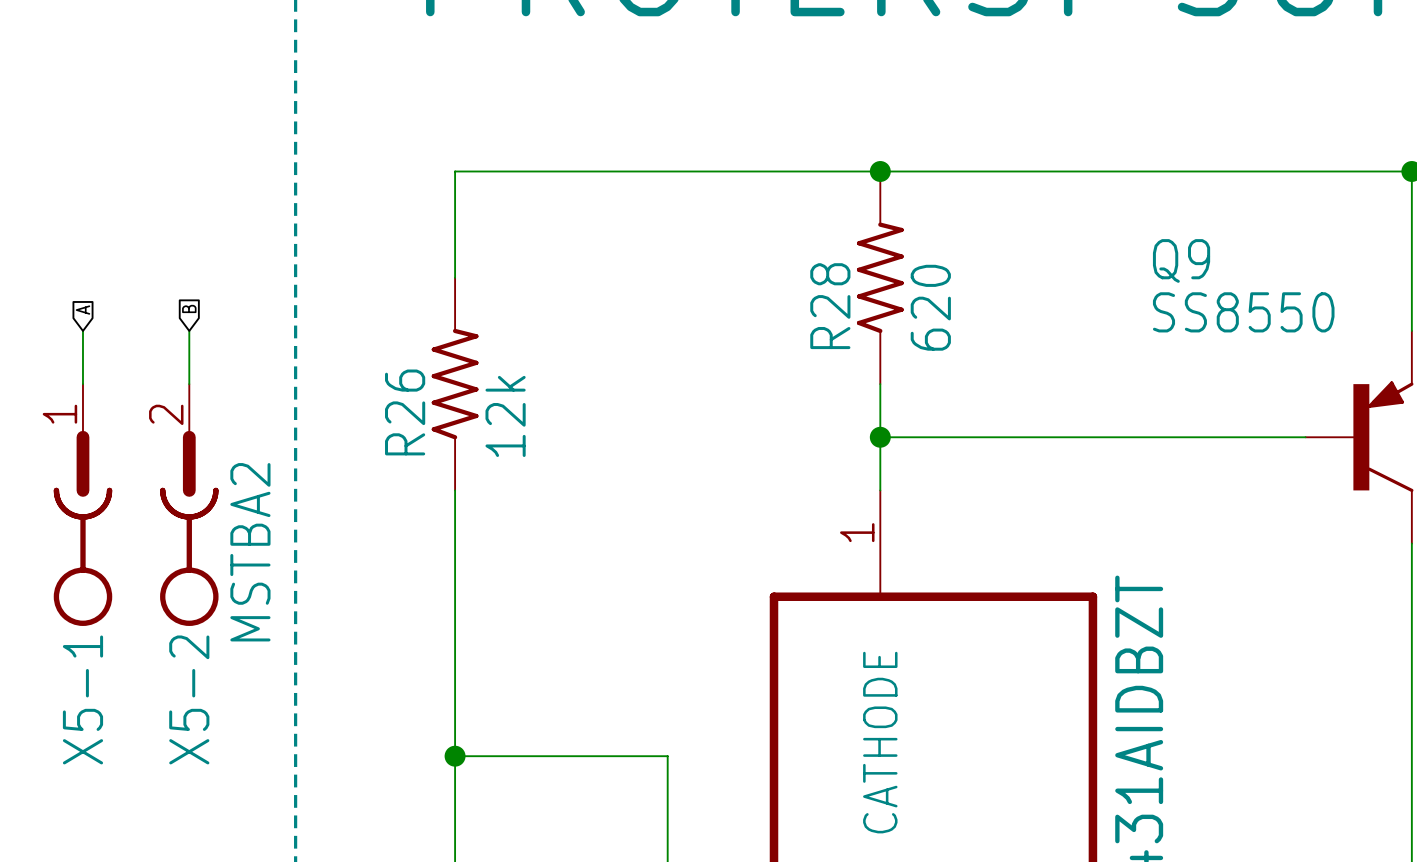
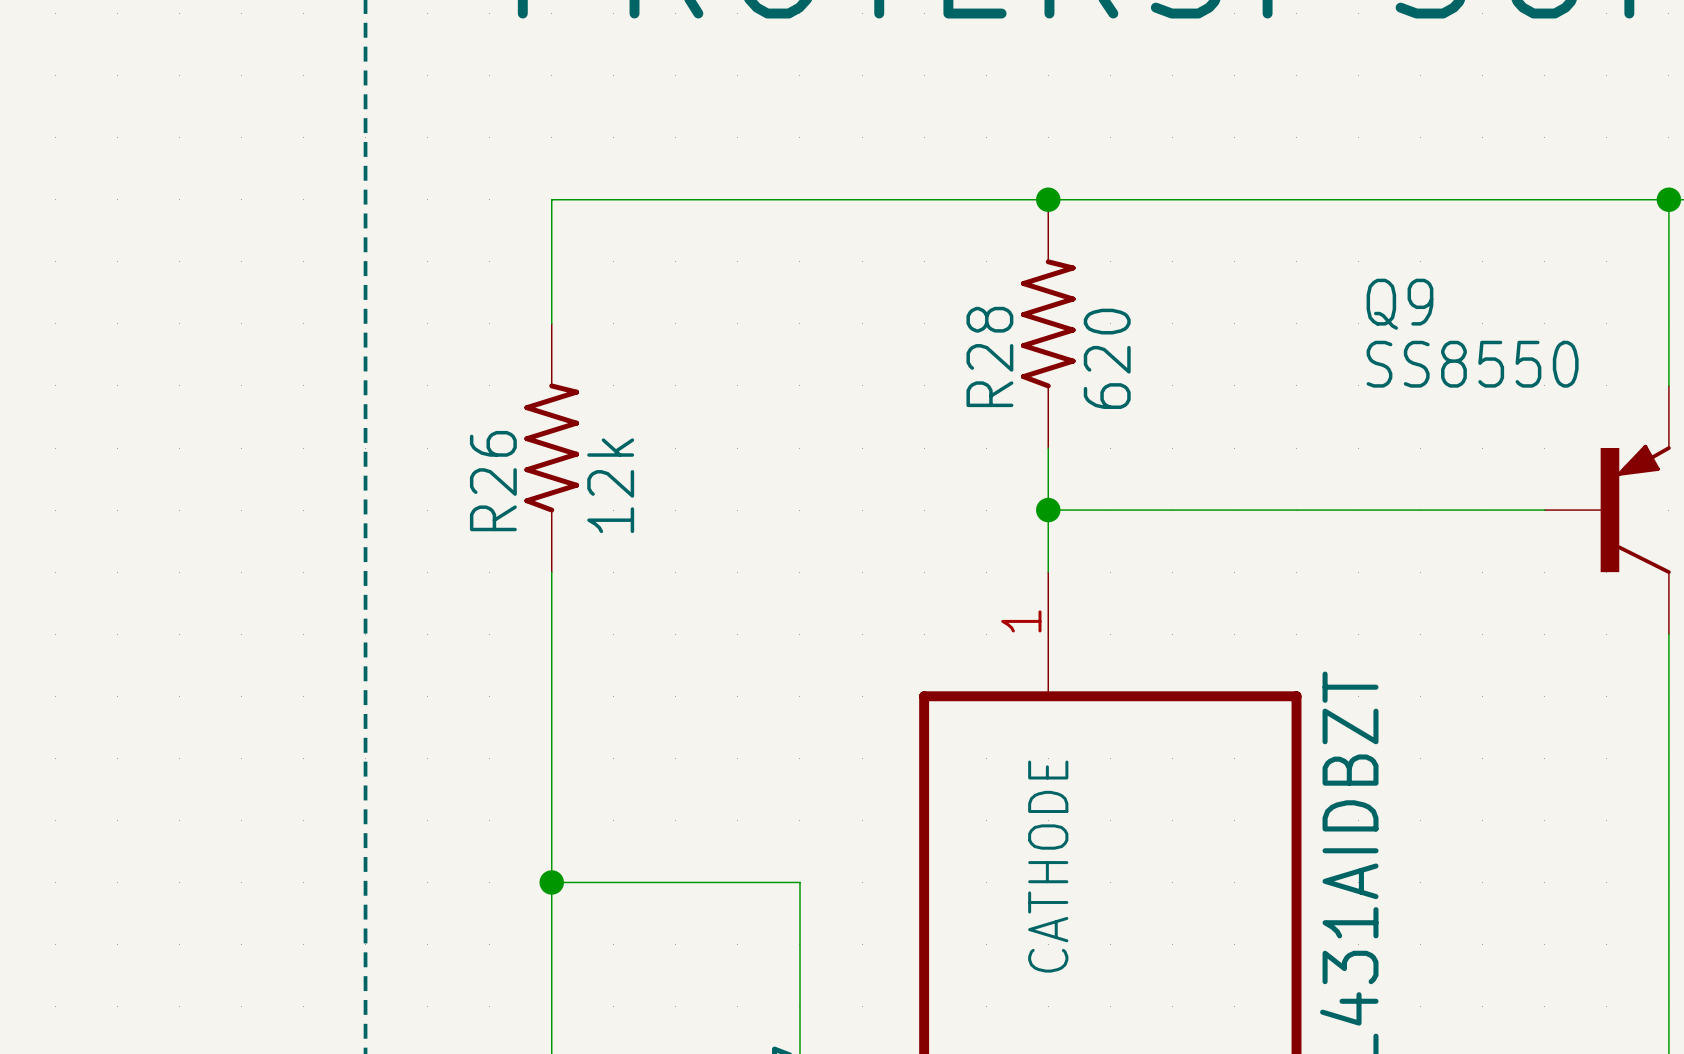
global label: B (189, 308) -> none
global label: A (82, 310) -> none
wire: (82, 330) (82, 384) -> none
wire: (189, 330) (189, 384) -> none
X5-1: (82, 505) -> none
X5-2: MSTBA2 (189, 505) -> none

